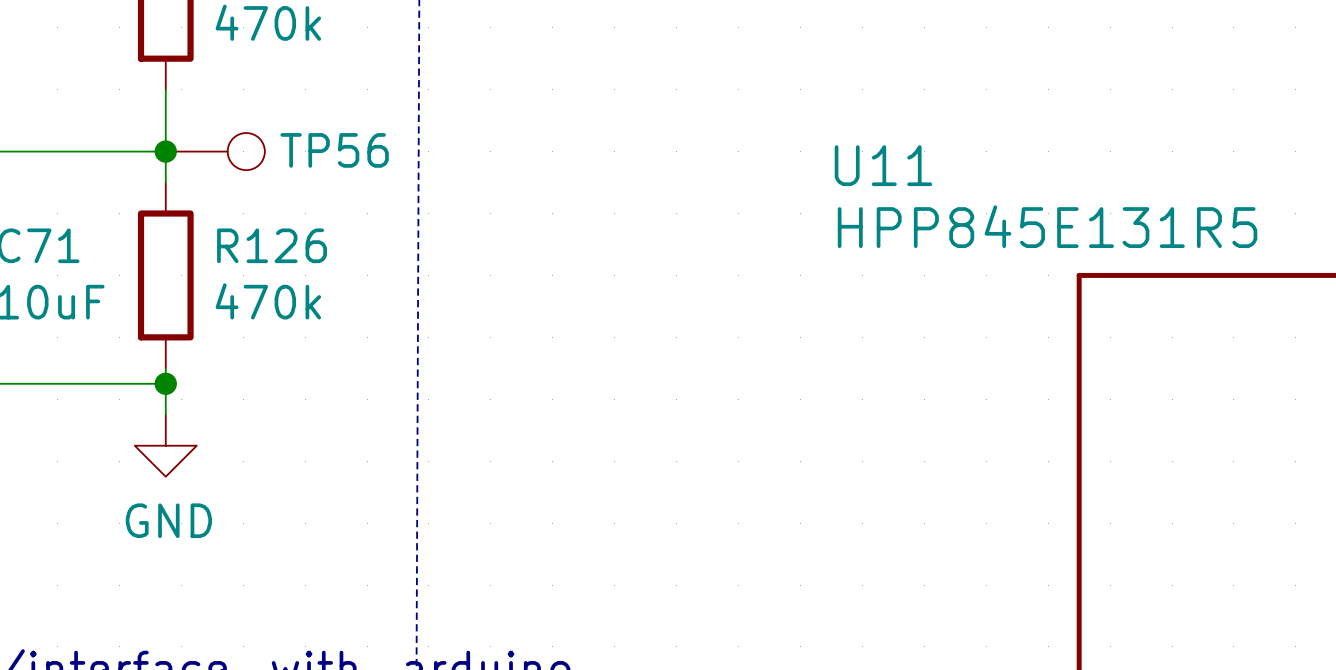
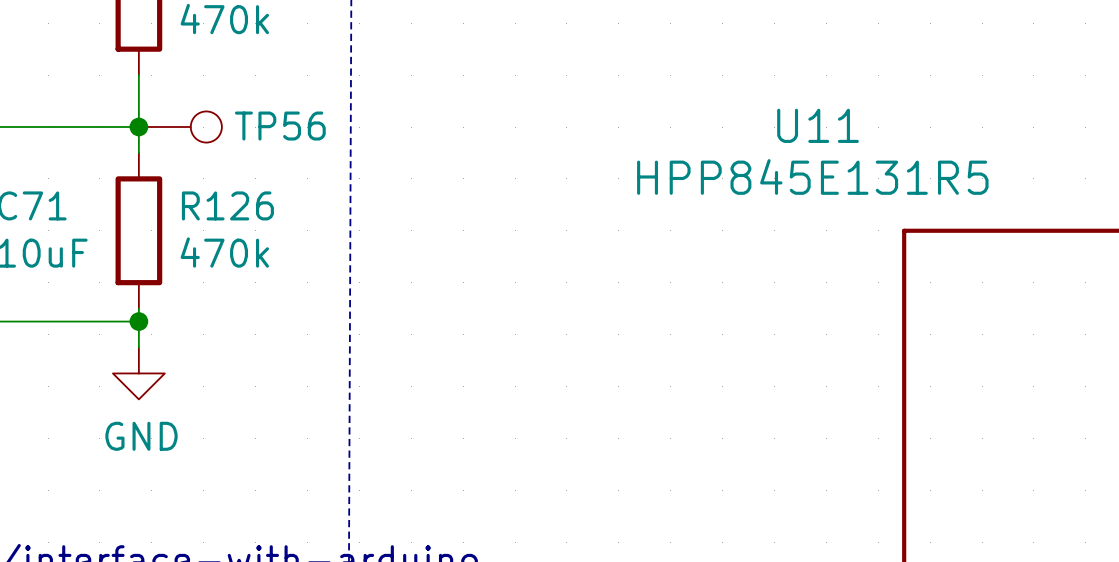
U11 name position: U11 (883, 165) -> U11 (818, 125)
U11 value position: HPP845E131R5 (1047, 226) -> HPP845E131R5 (812, 176)

